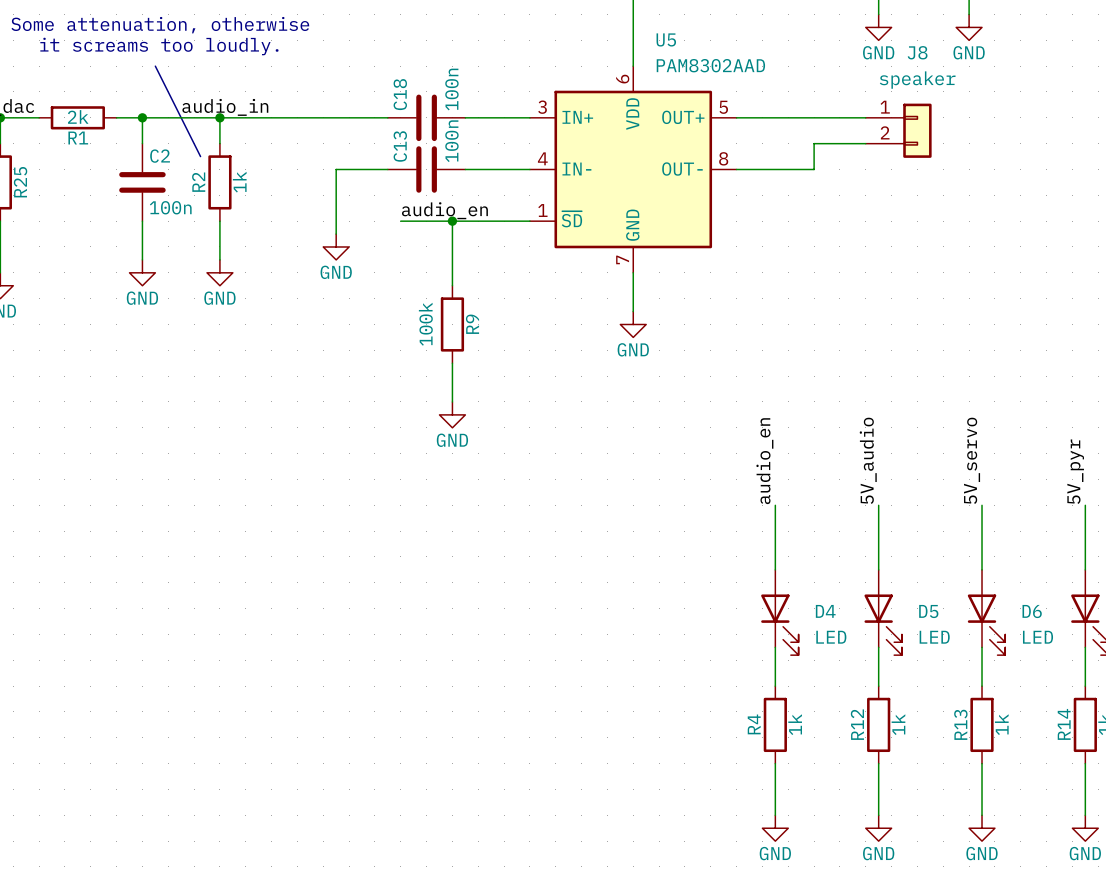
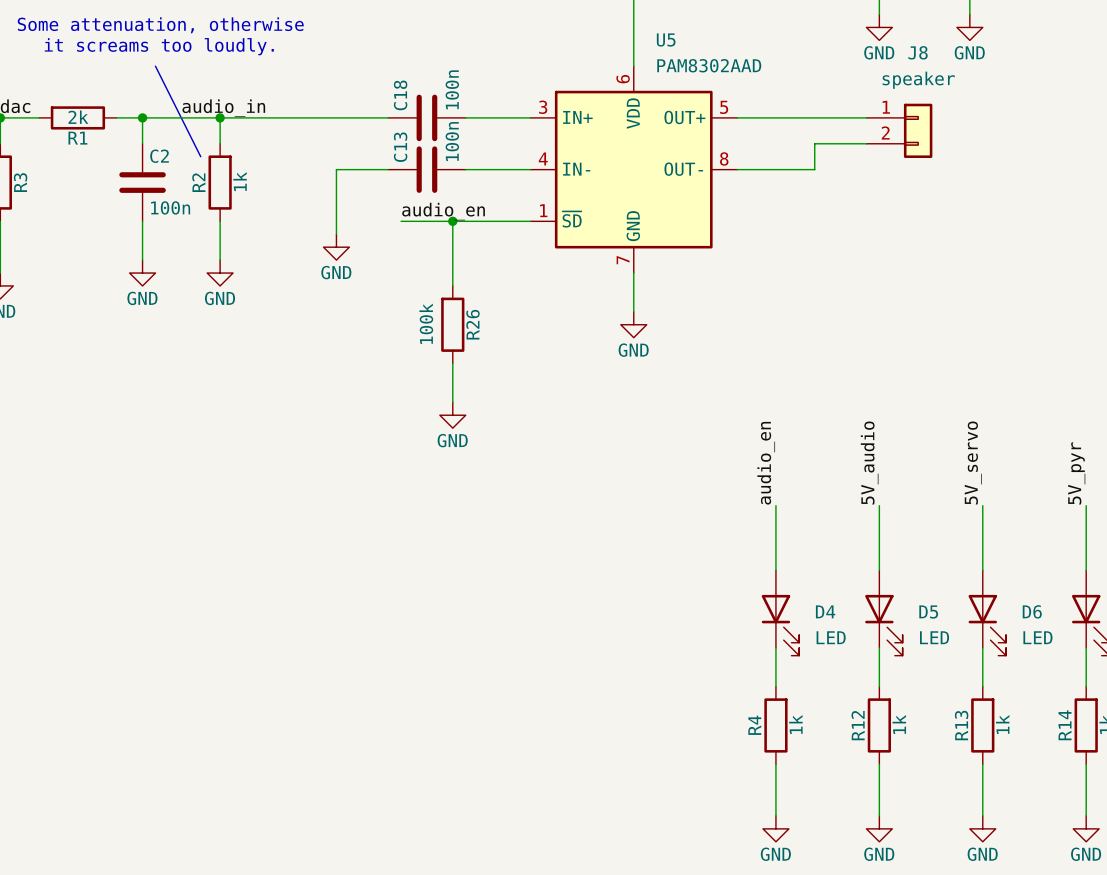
R25 name: R25 (20, 182) -> R3 (20, 182)
R9 name: R9 (472, 324) -> R26 (473, 324)

